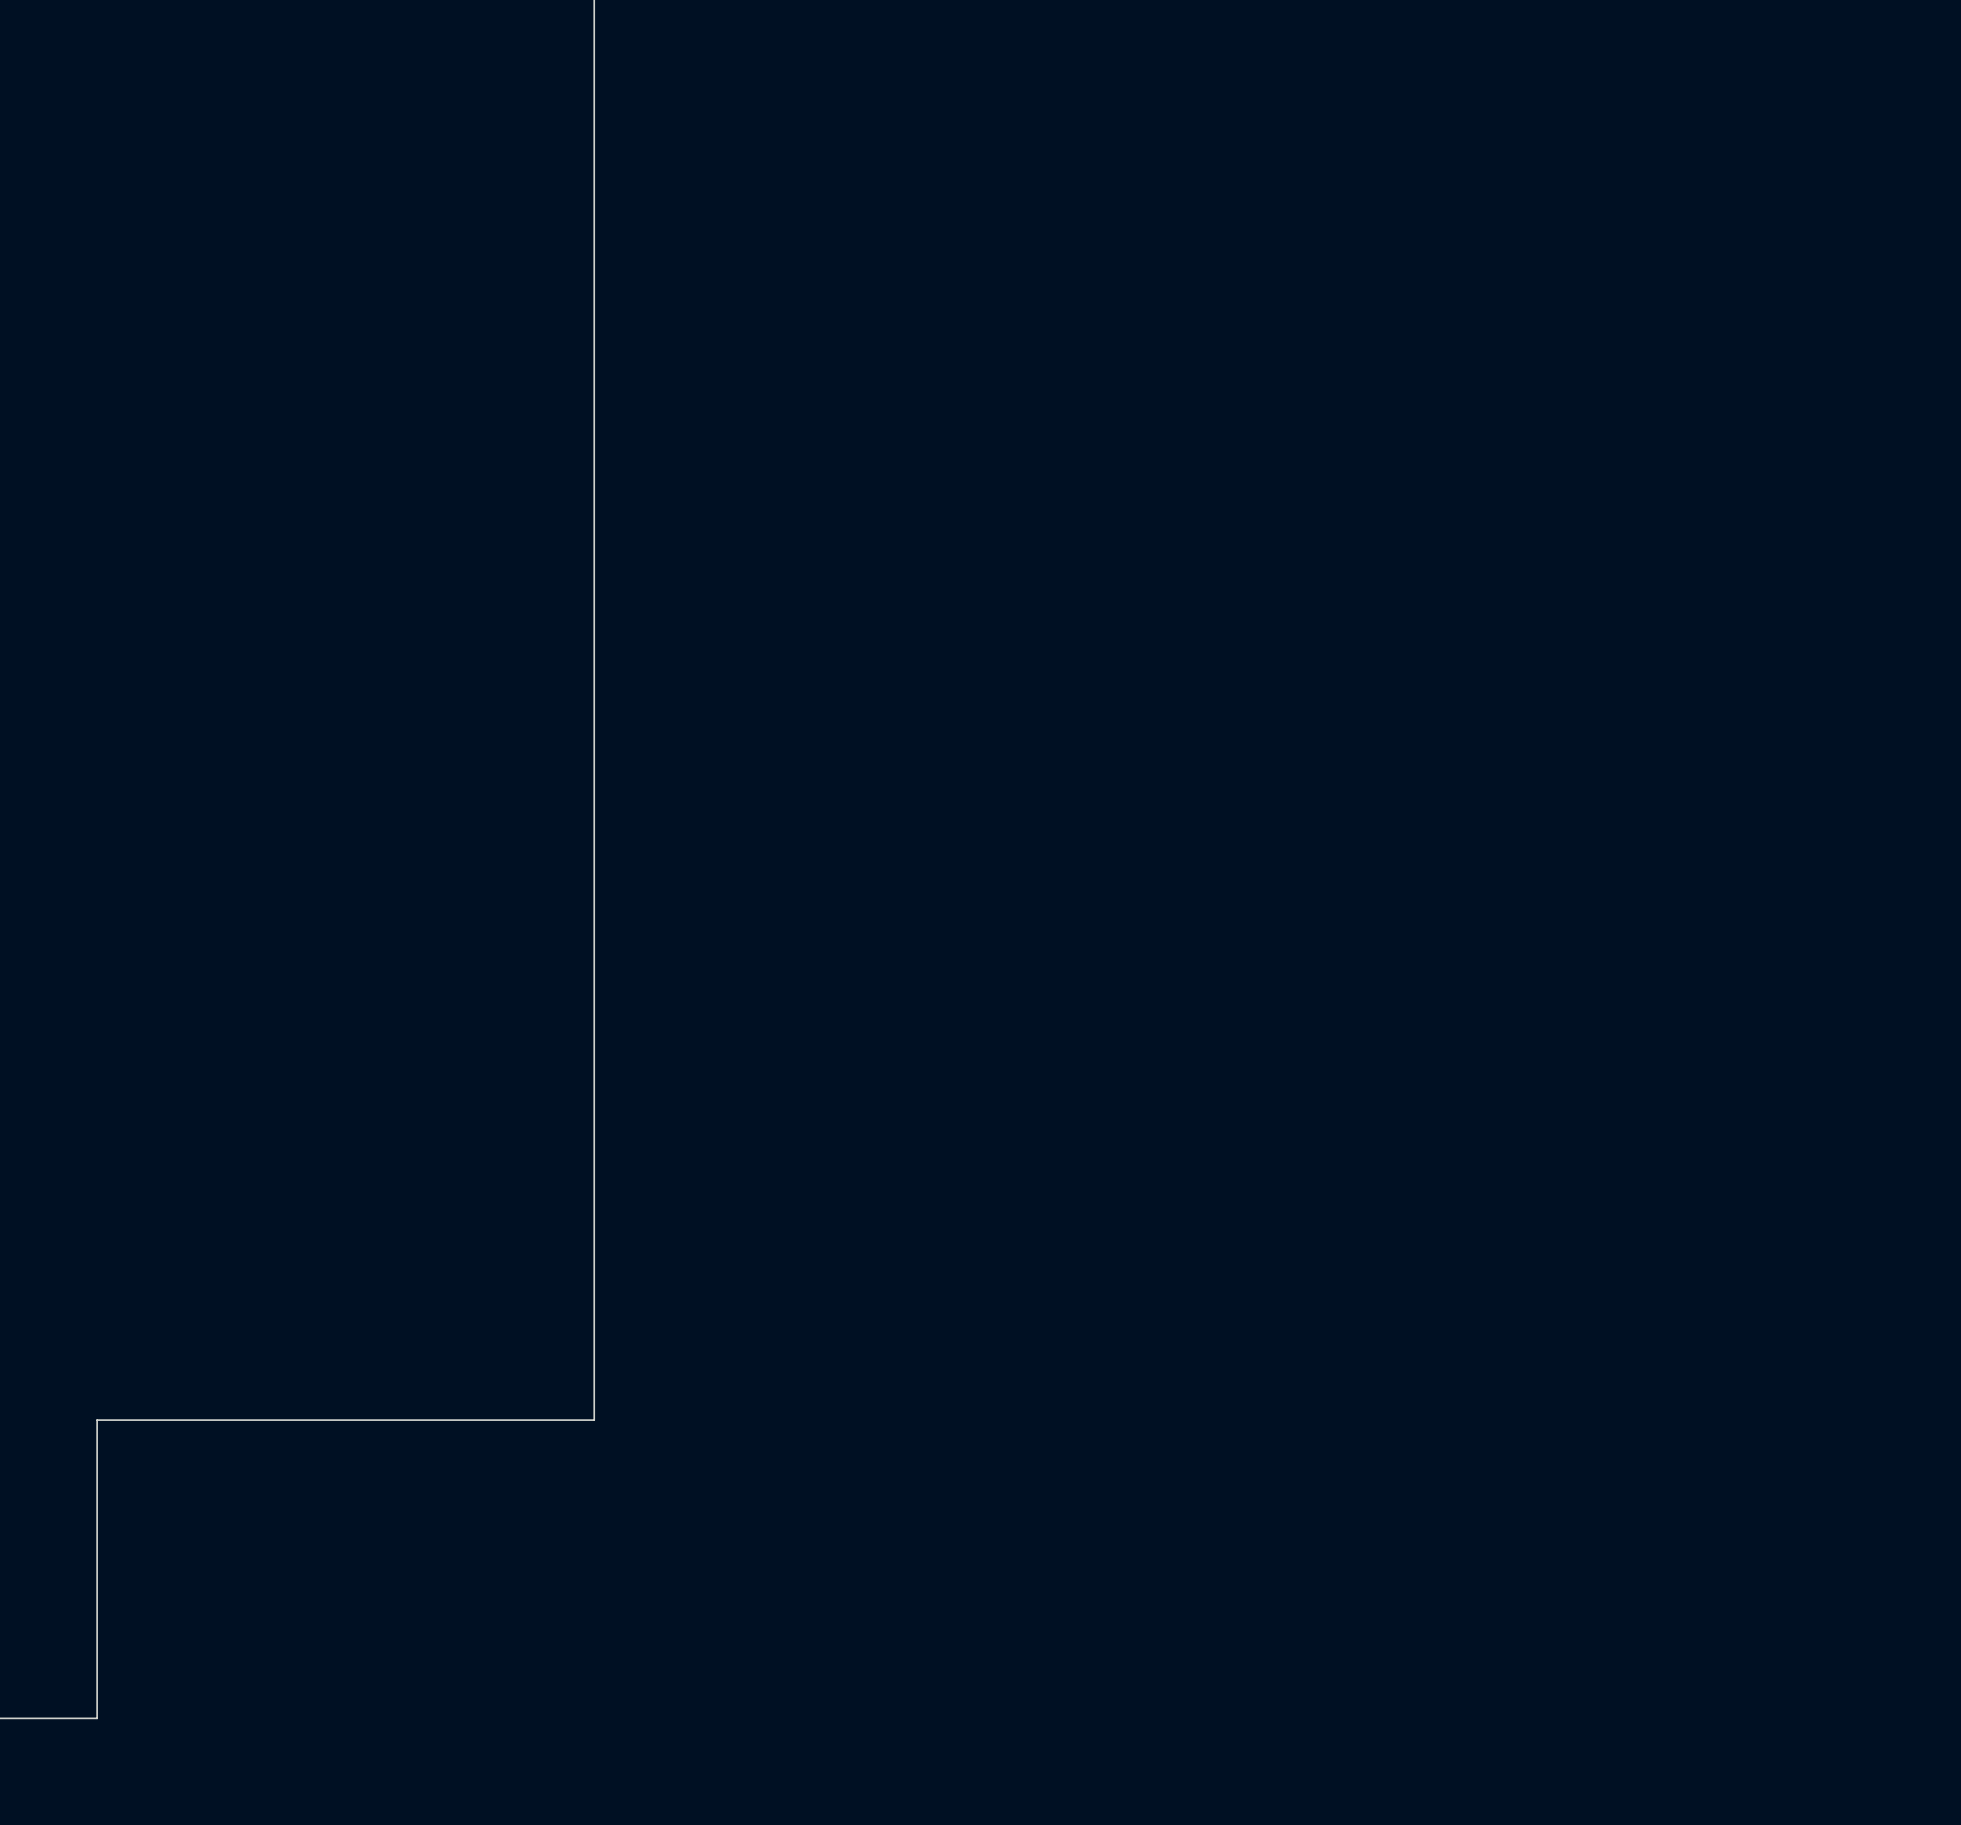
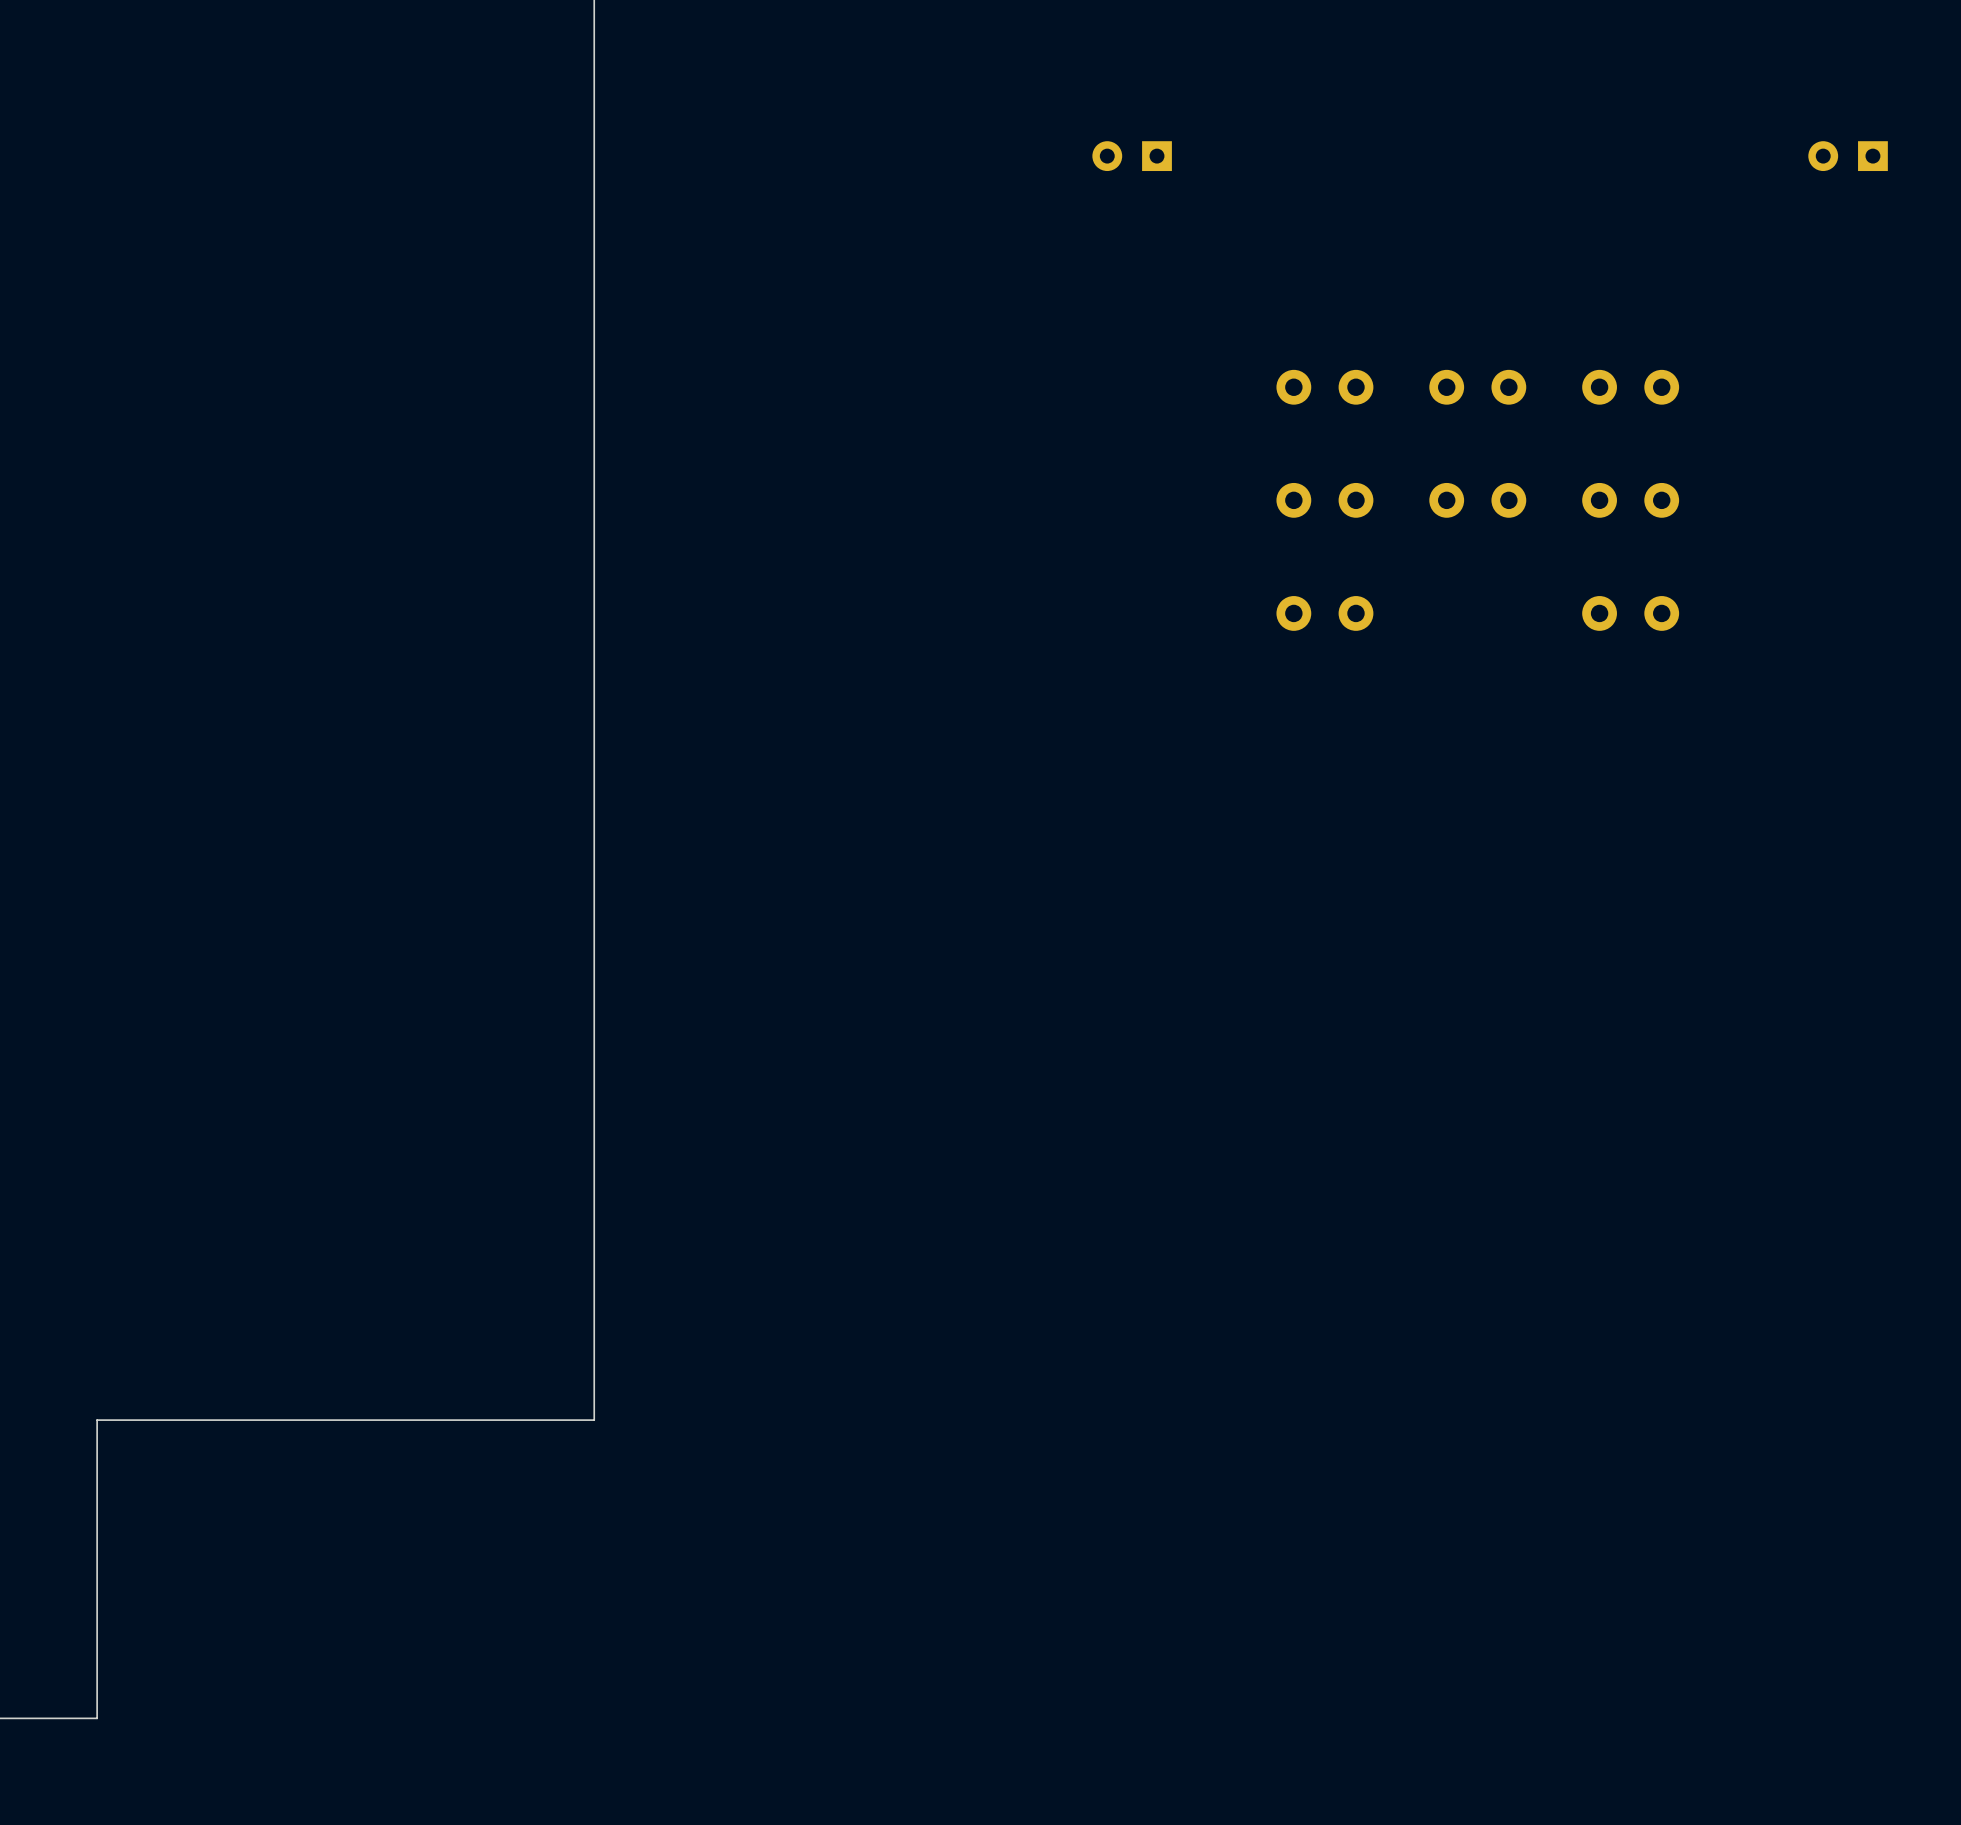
part: none -> (1132, 156)
part: none -> (1848, 156)
part: none -> (1324, 387)
part: none -> (1477, 387)
part: none -> (1630, 387)
part: none -> (1324, 500)
part: none -> (1477, 500)
part: none -> (1630, 500)
part: none -> (1324, 613)
part: none -> (1630, 613)

